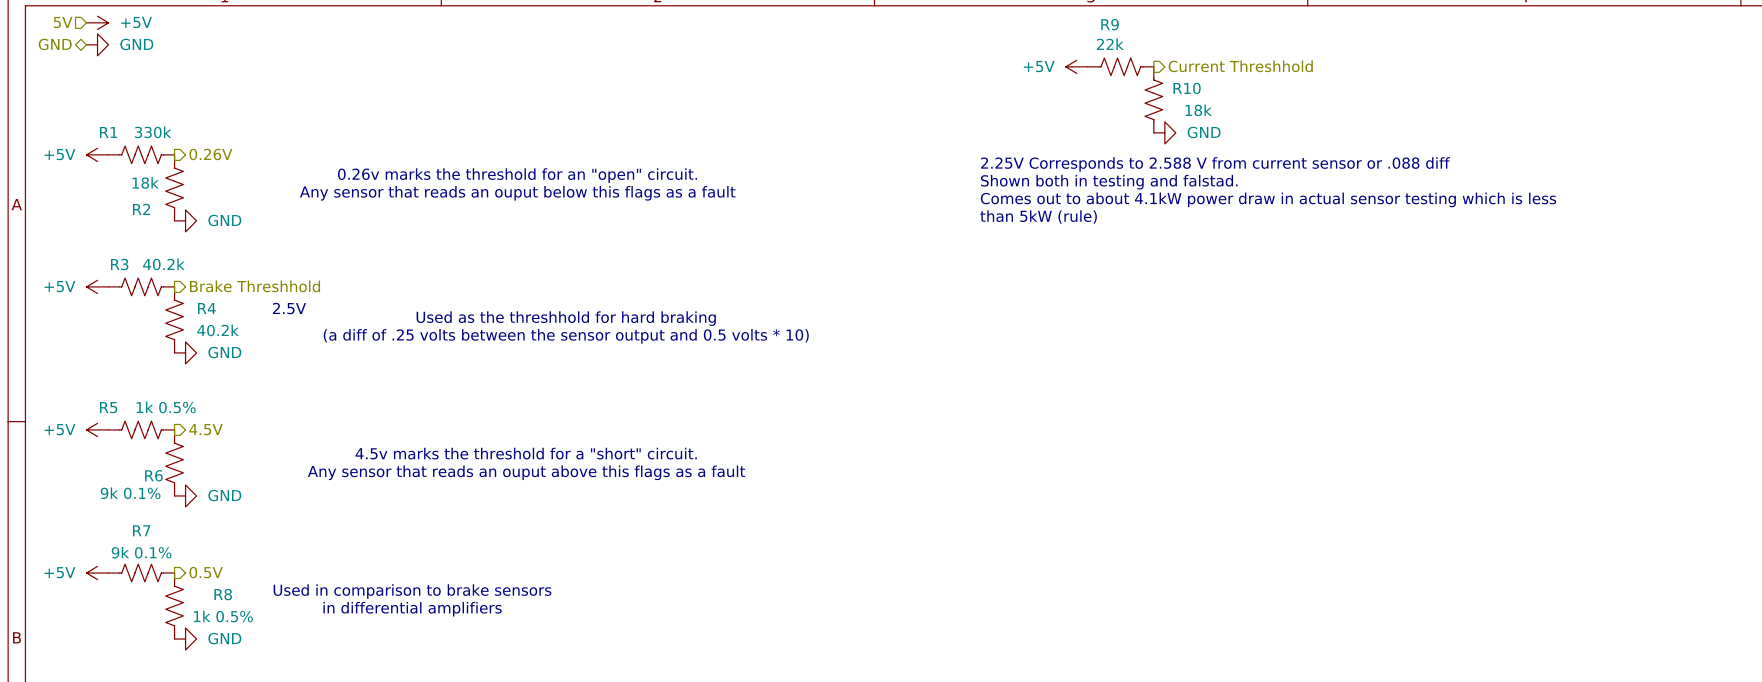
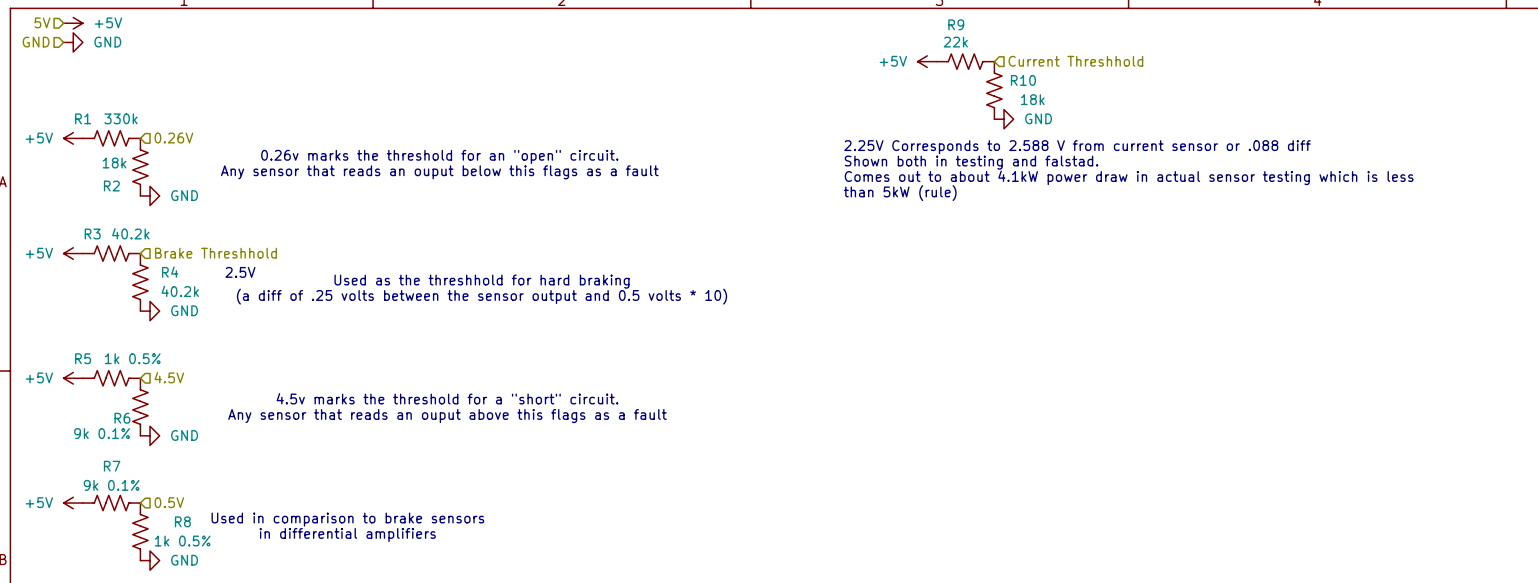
hierarchical label shape: bidirectional (55, 44) -> input (36, 42)
hierarchical label shape: output (1240, 66) -> input (1075, 61)
hierarchical label shape: output (210, 154) -> input (173, 138)
hierarchical label shape: output (255, 286) -> input (215, 253)
hierarchical label shape: output (206, 429) -> input (169, 377)
hierarchical label shape: output (206, 572) -> input (169, 502)

